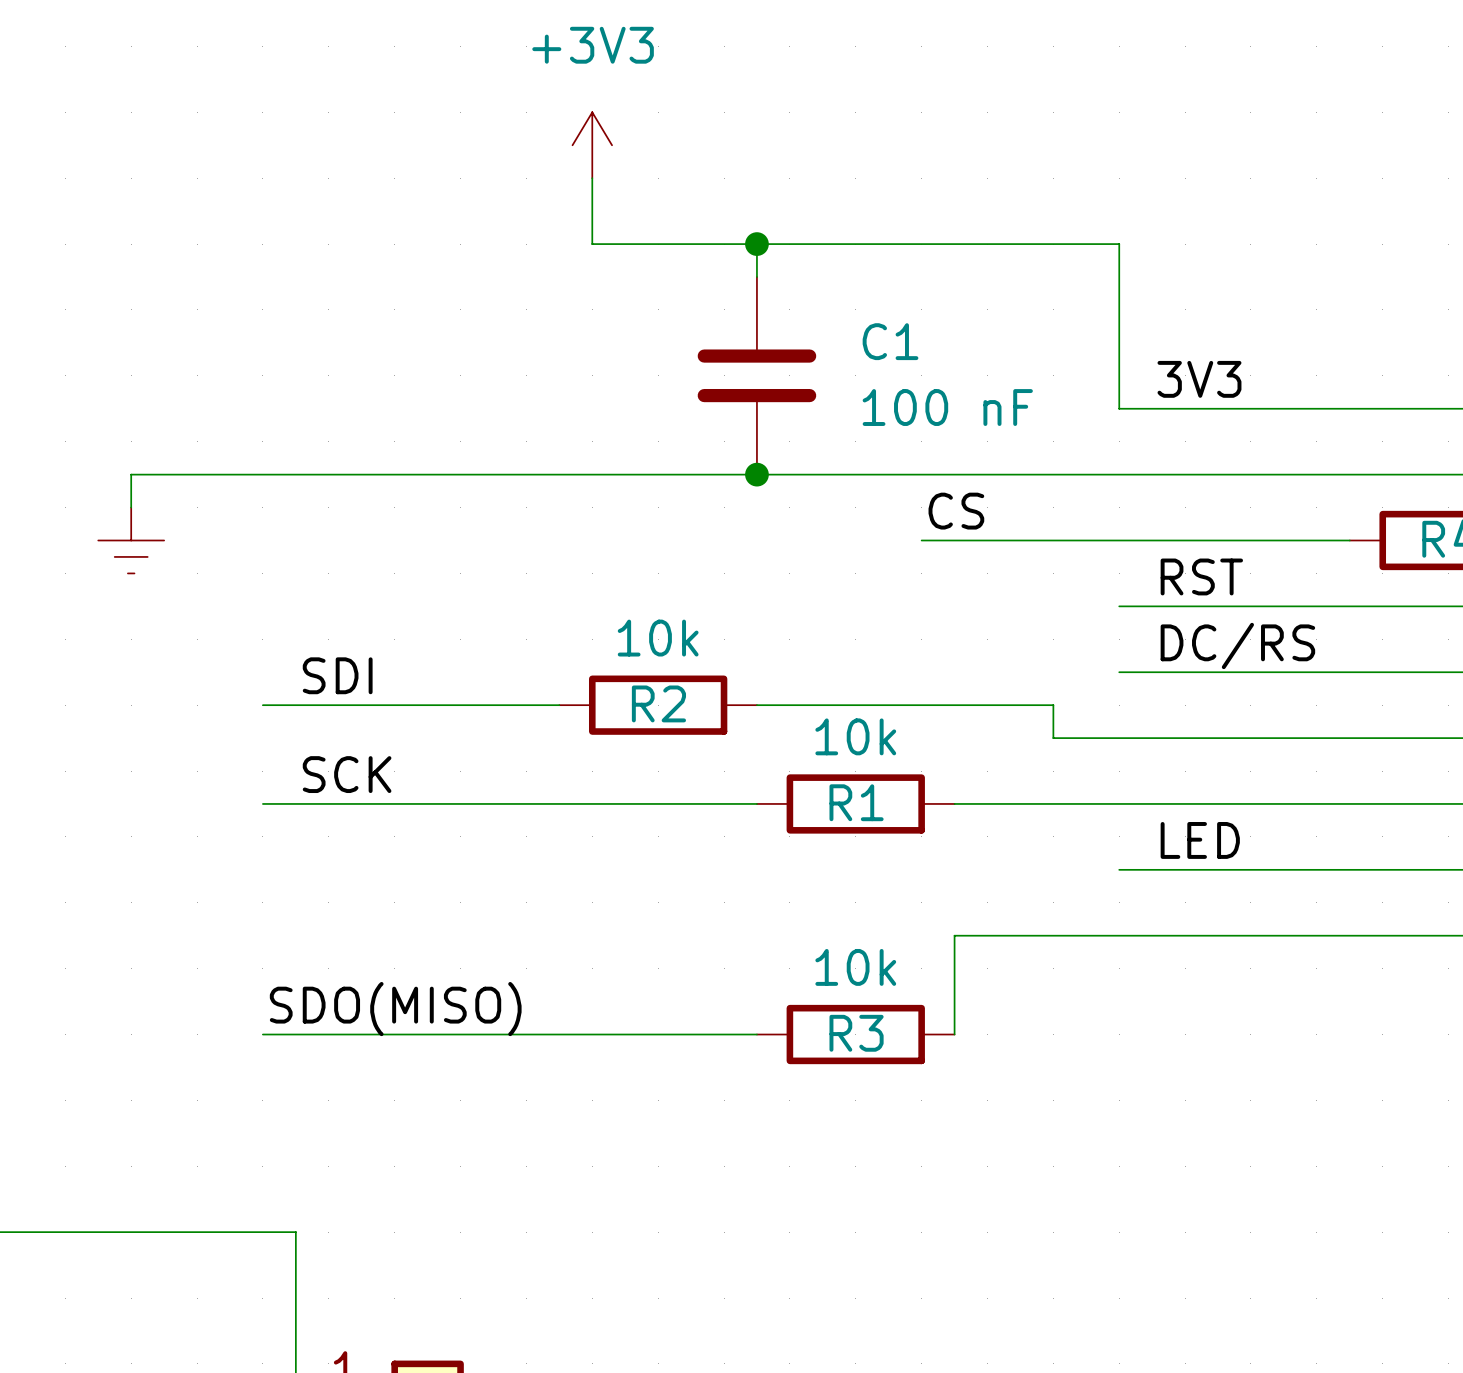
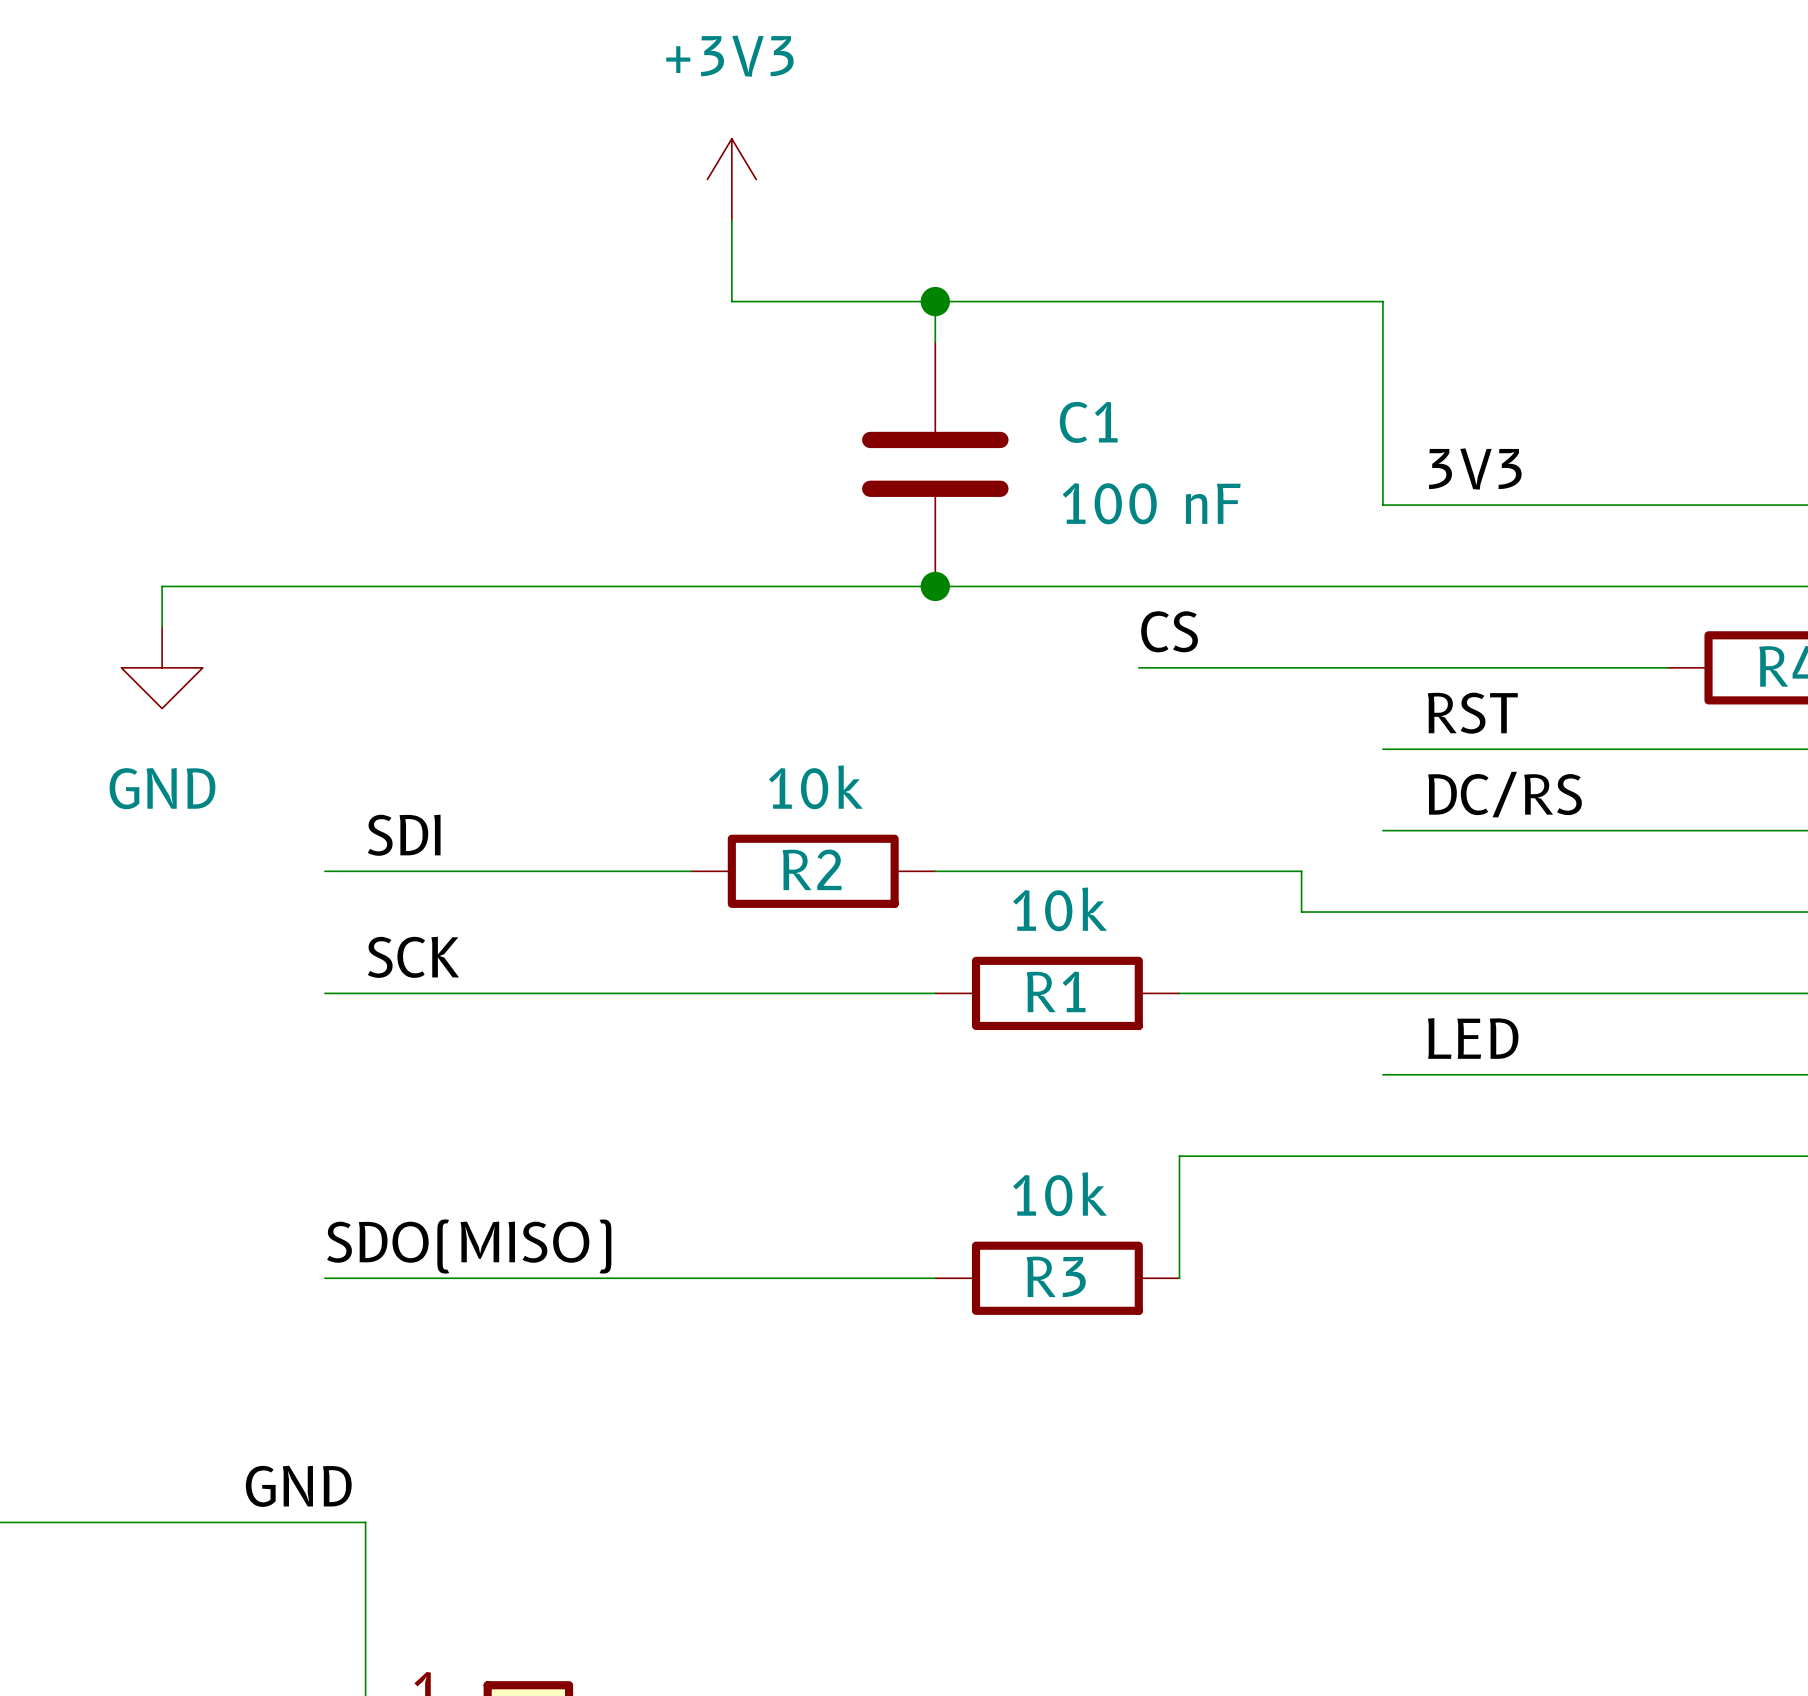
power symbol shape: [98, 507, 165, 574] -> [121, 627, 203, 709]
power symbol text: none -> GND (162, 788)
label: none -> GND (298, 1486)

